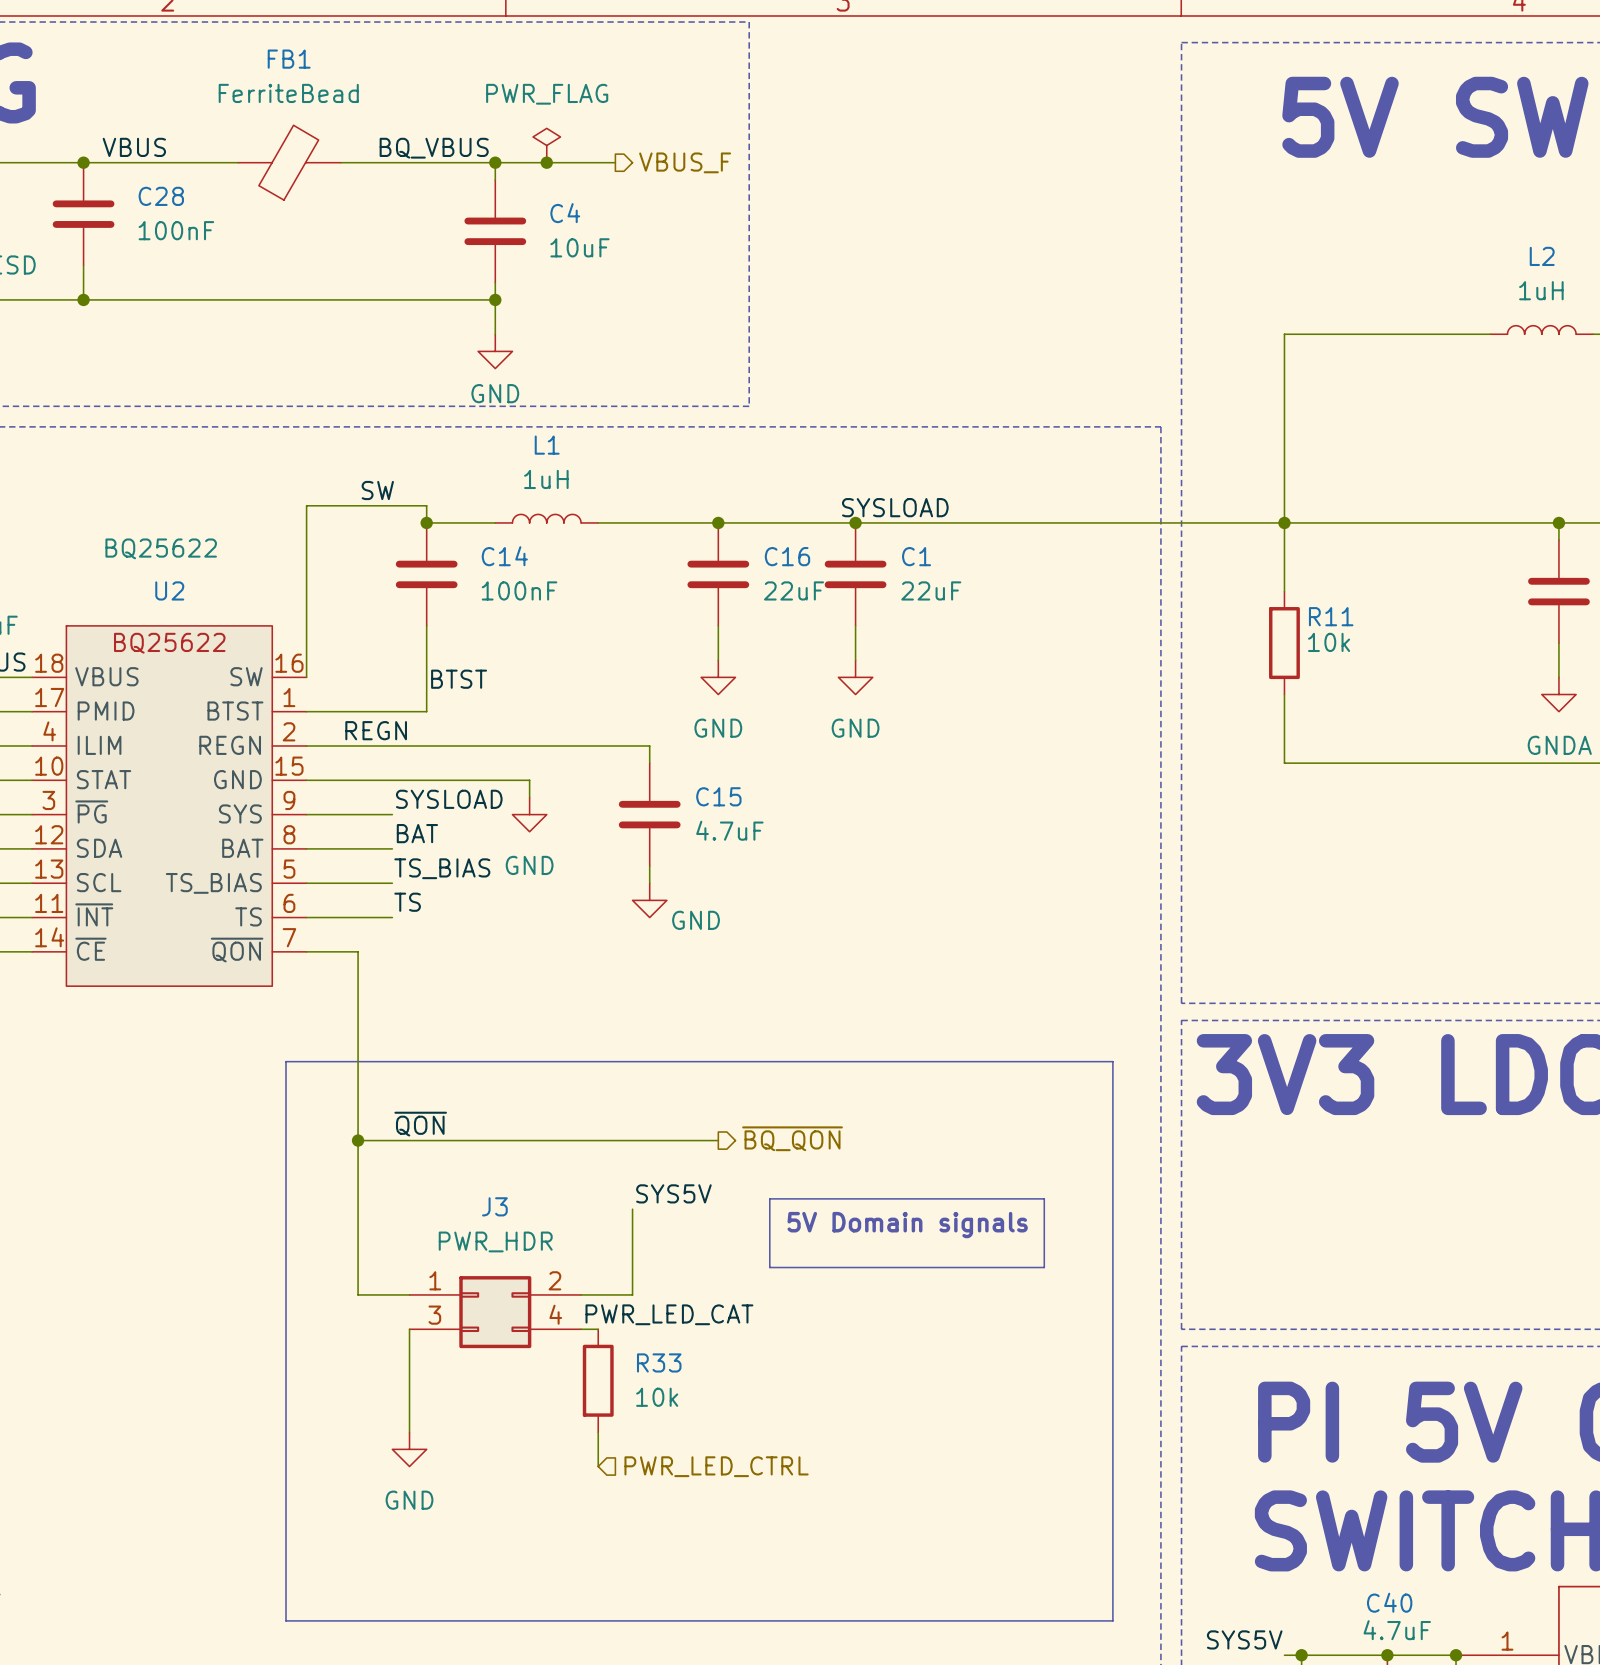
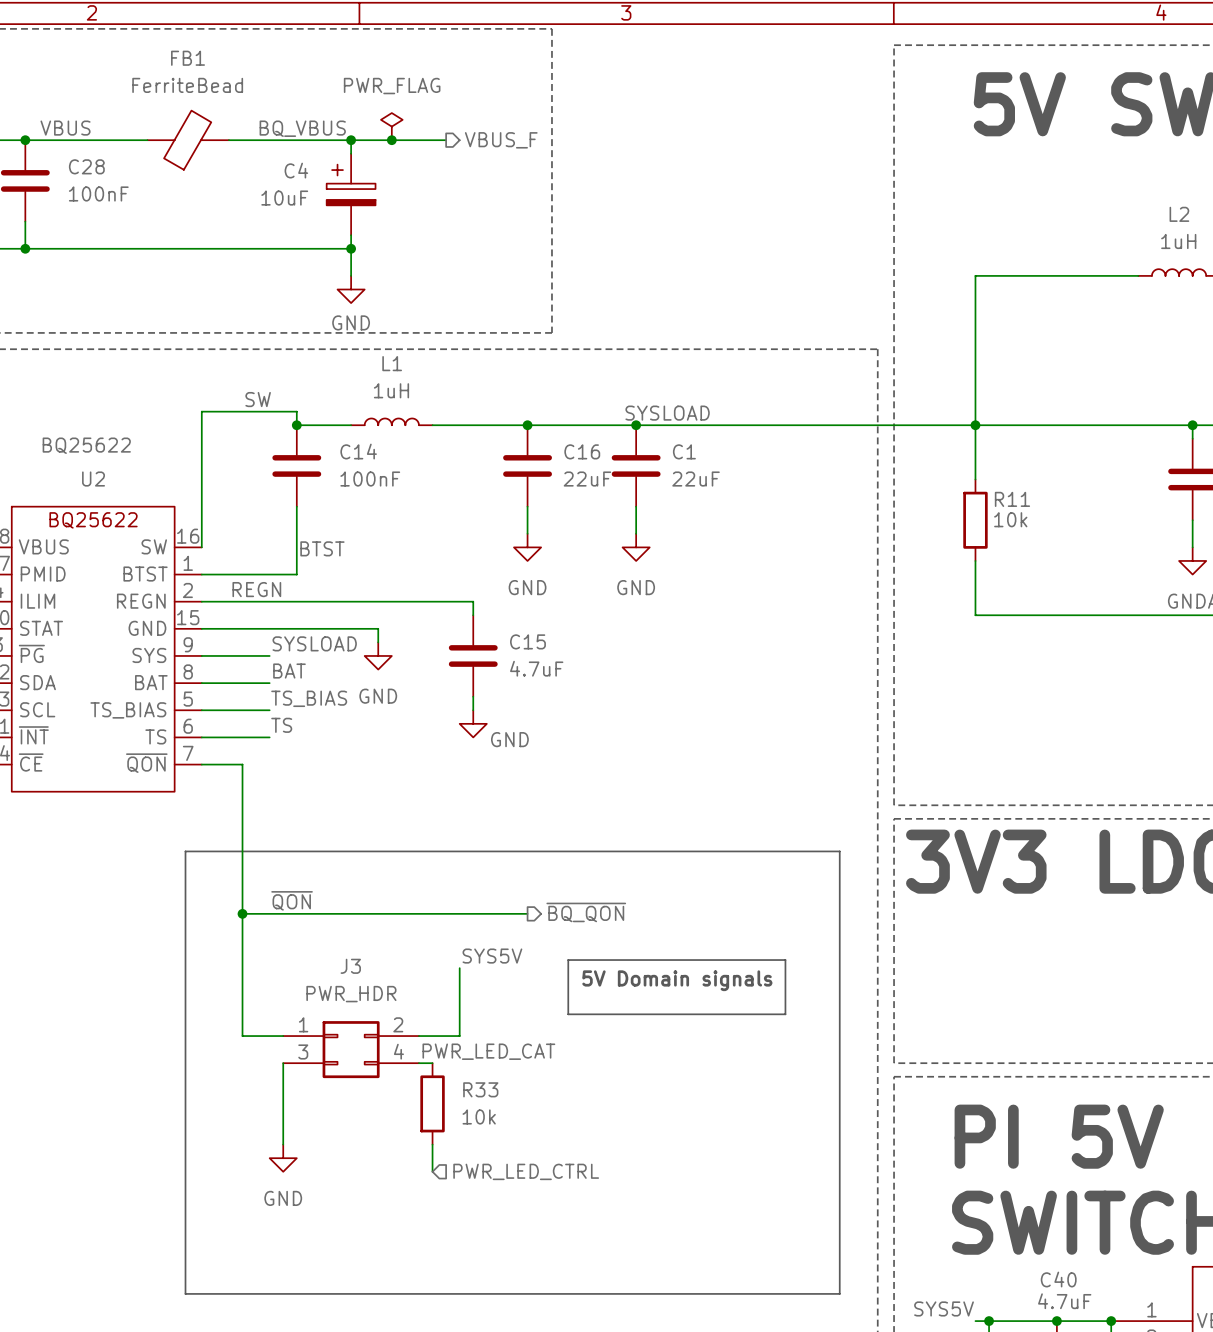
C4 symbol: [464, 179, 527, 283] -> [326, 153, 376, 236]
C4 name position: C4 (565, 213) -> C4 (296, 170)
C4 value position: 10uF (579, 247) -> 10uF (284, 198)

